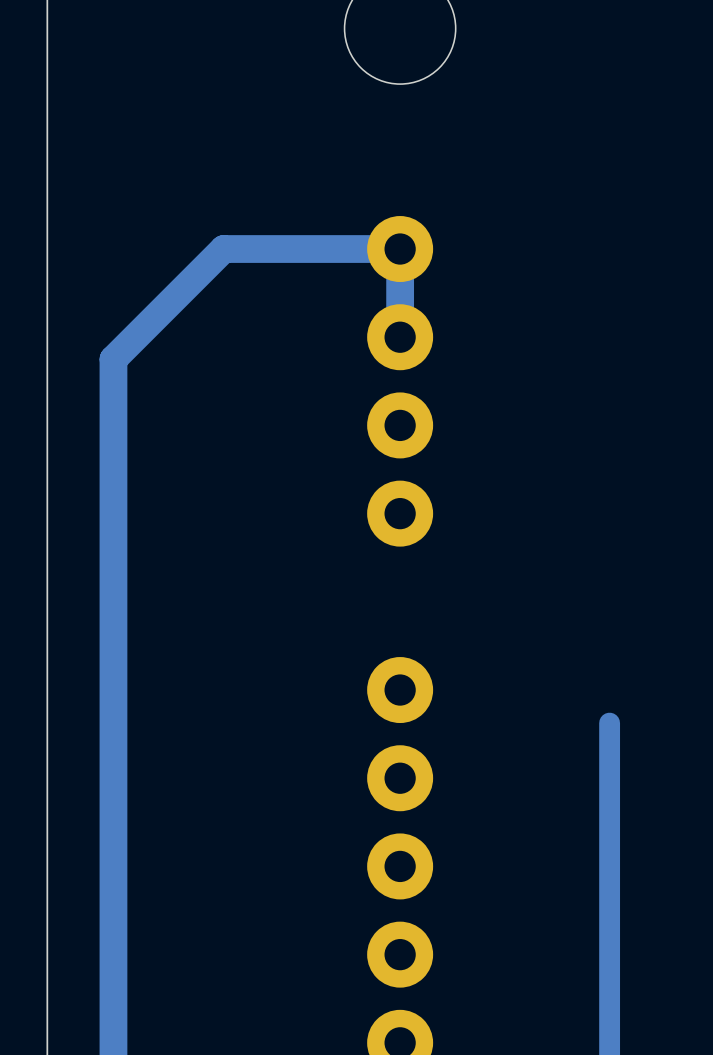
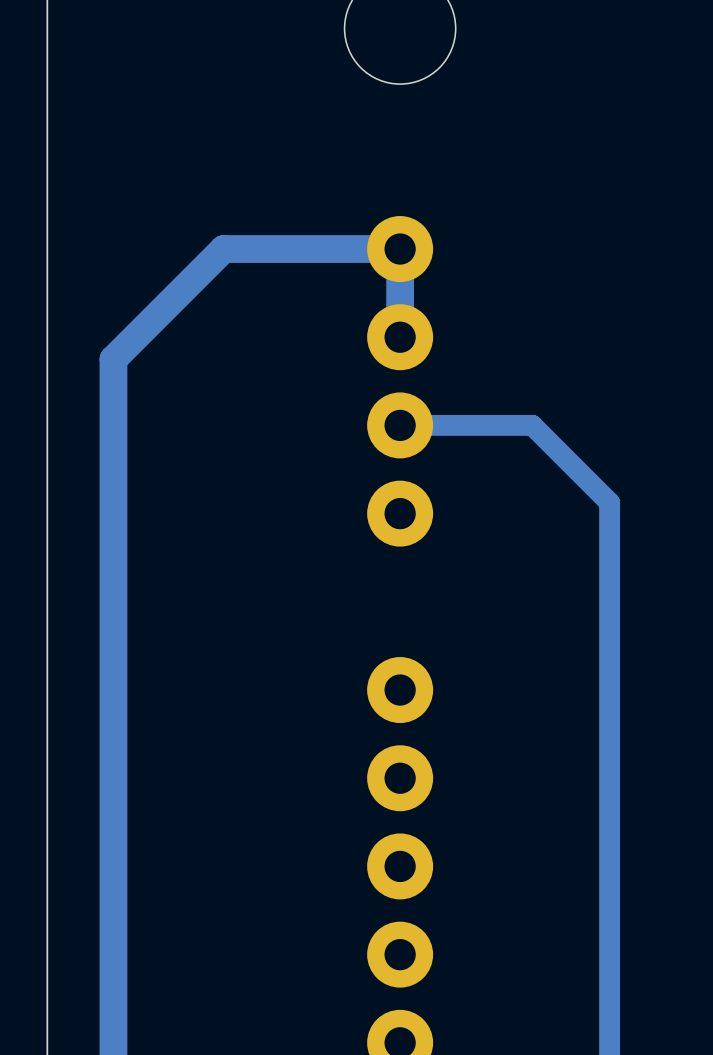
track: none -> (400, 425) (532, 425) (609, 502) (609, 723)

